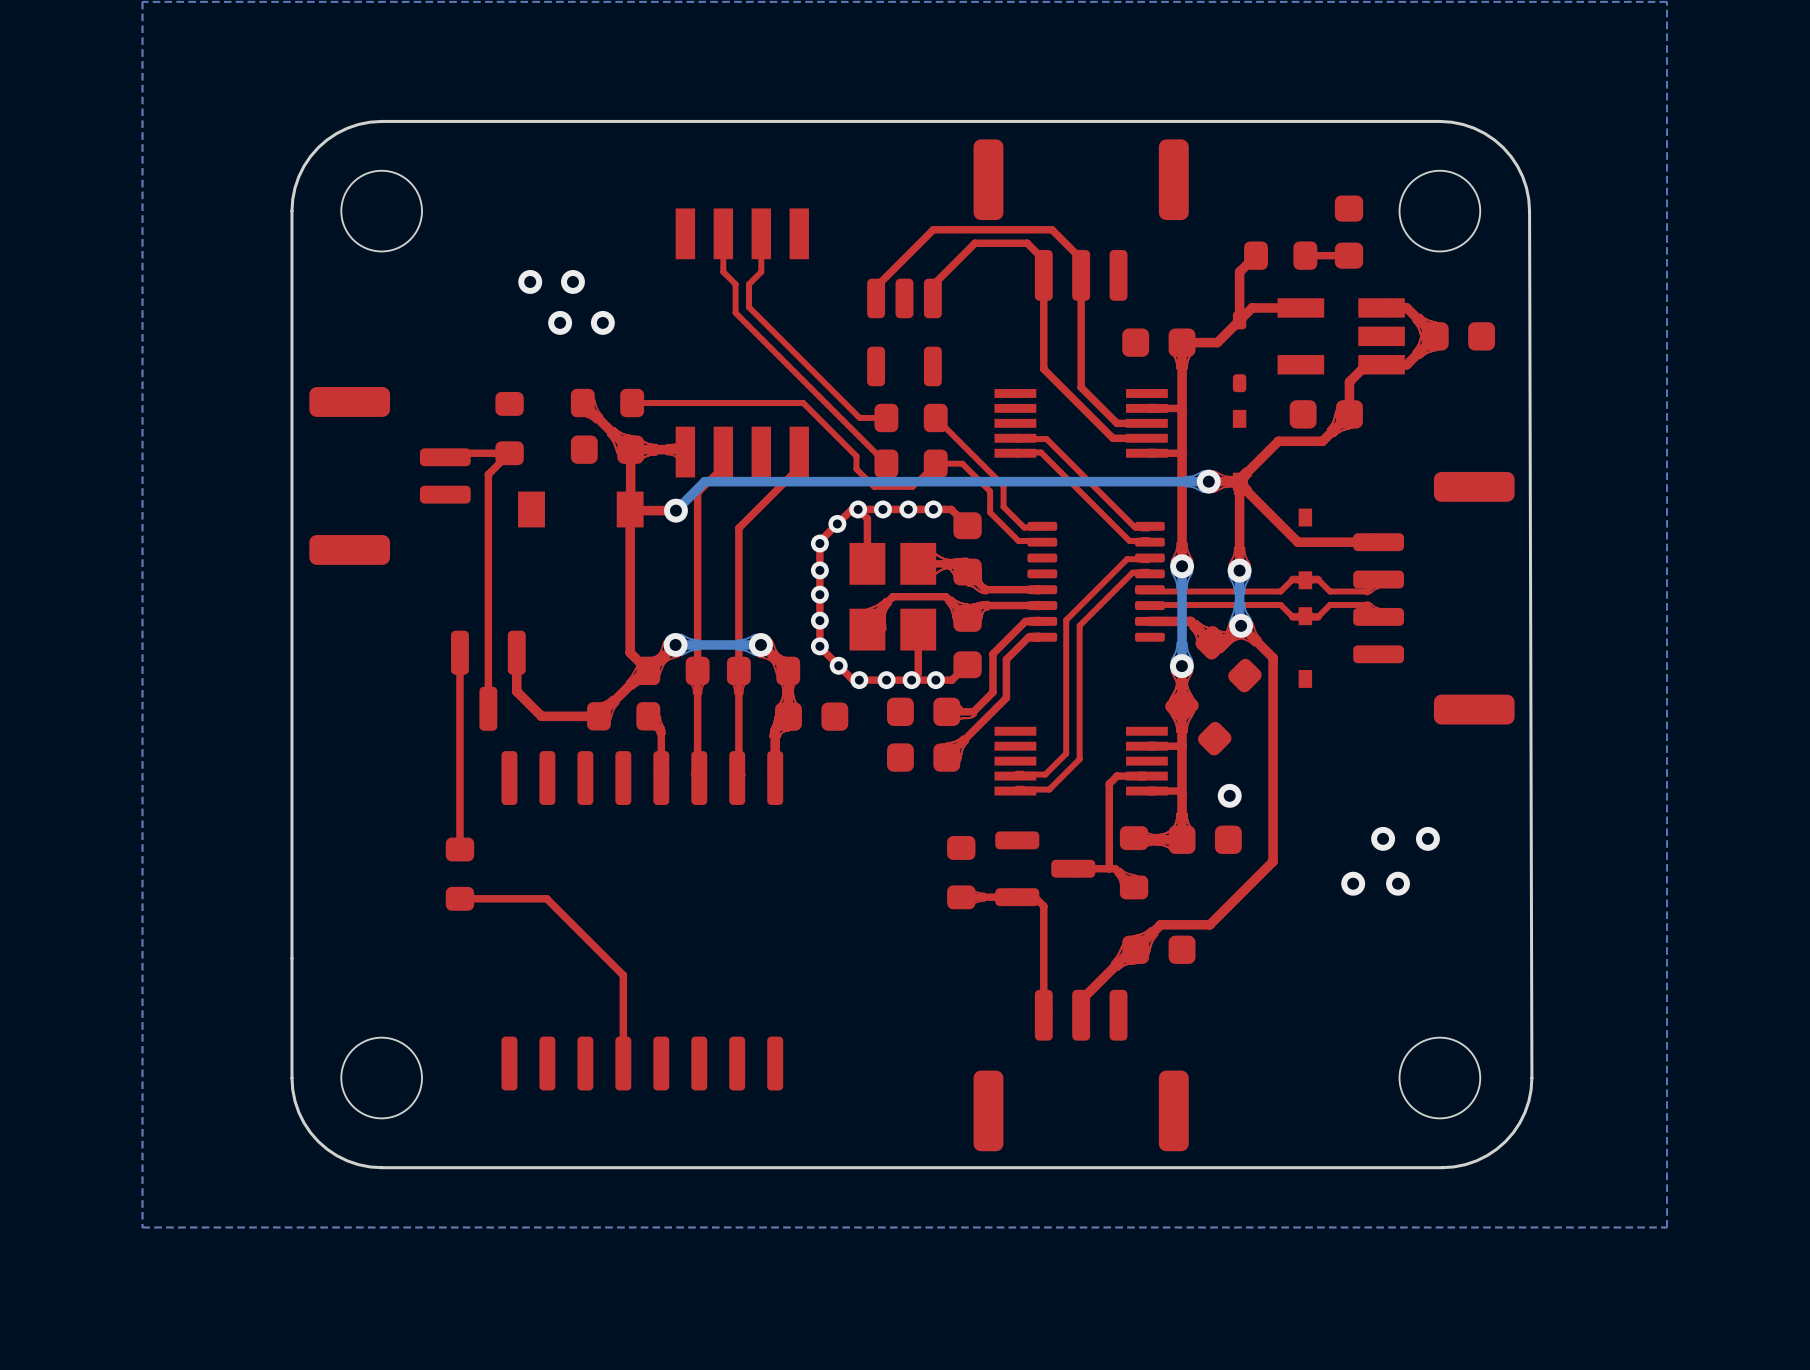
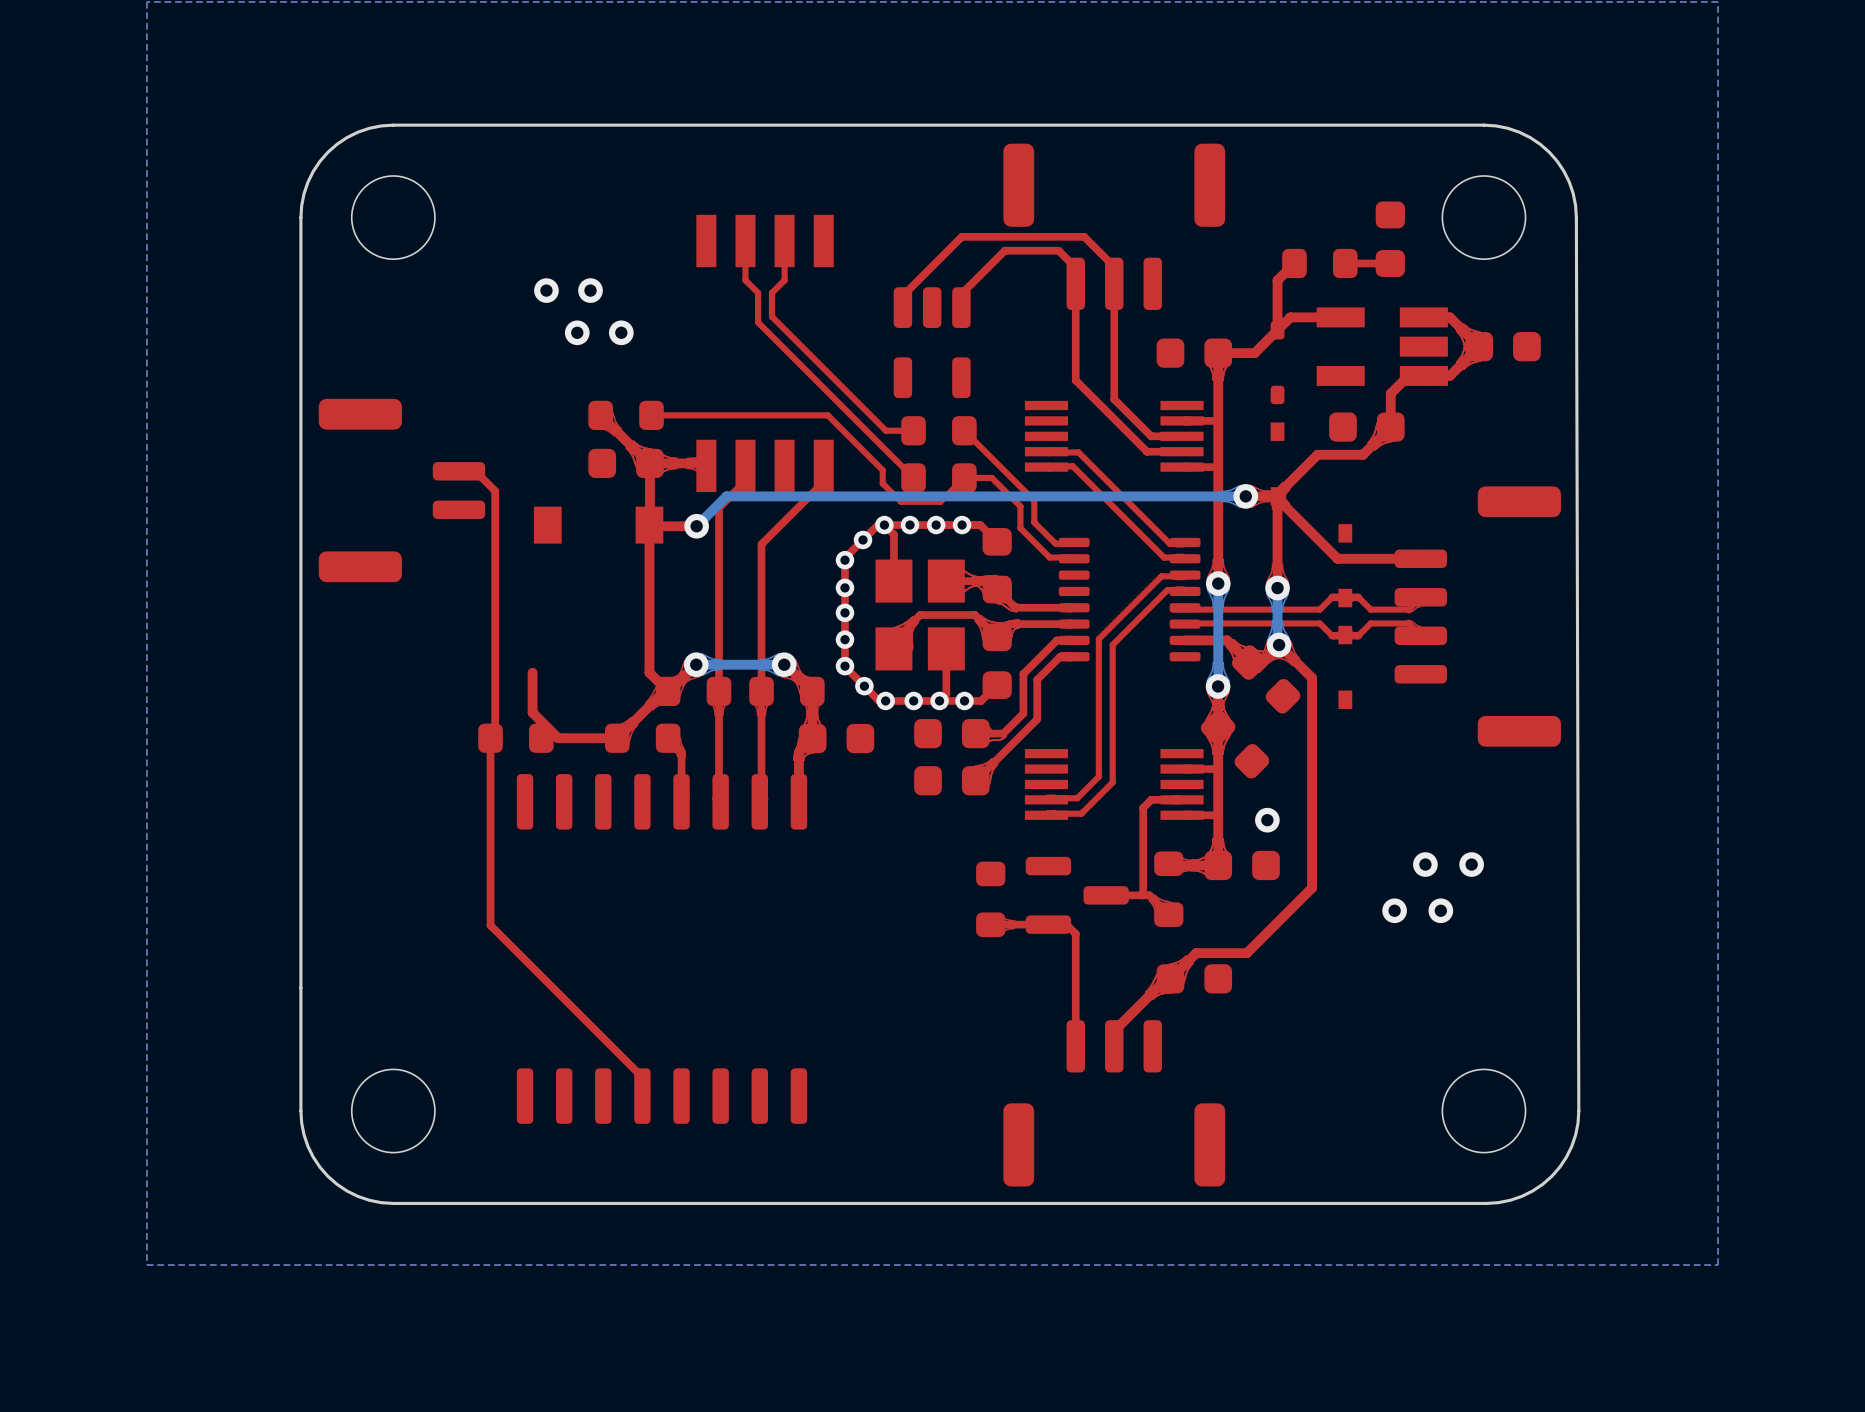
part: (509, 428) -> none
top track: (445, 457) (449, 453) (509, 453) (488, 474) (488, 708) -> (458, 471) (475, 471) (495, 490) (495, 733) (490, 738) (490, 925) (642, 1077)
top track: (459, 652) (459, 849) -> none
part: (488, 680) -> none
part: none -> (515, 738)
part: (459, 874) -> none
top track: (459, 898) (546, 898) (623, 975) (623, 1045) -> none

